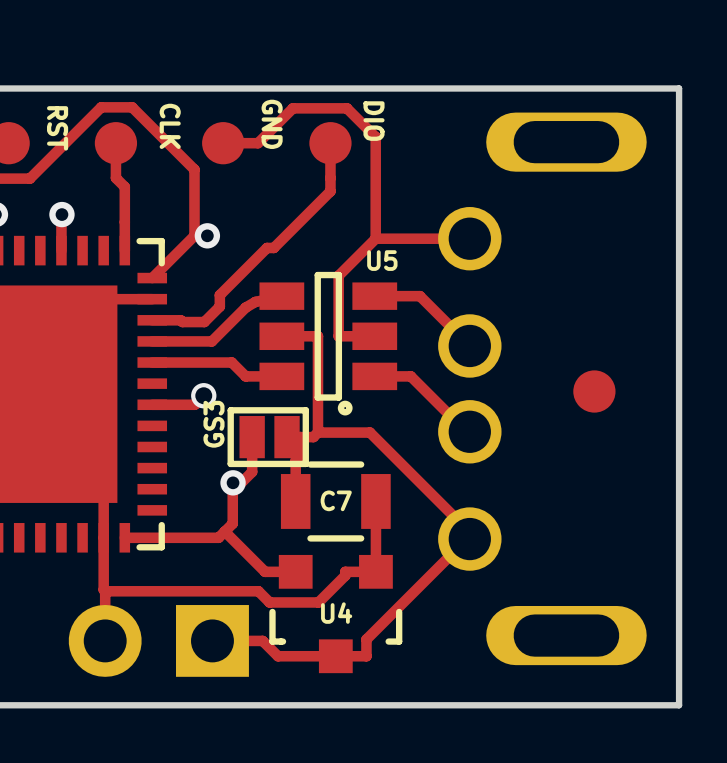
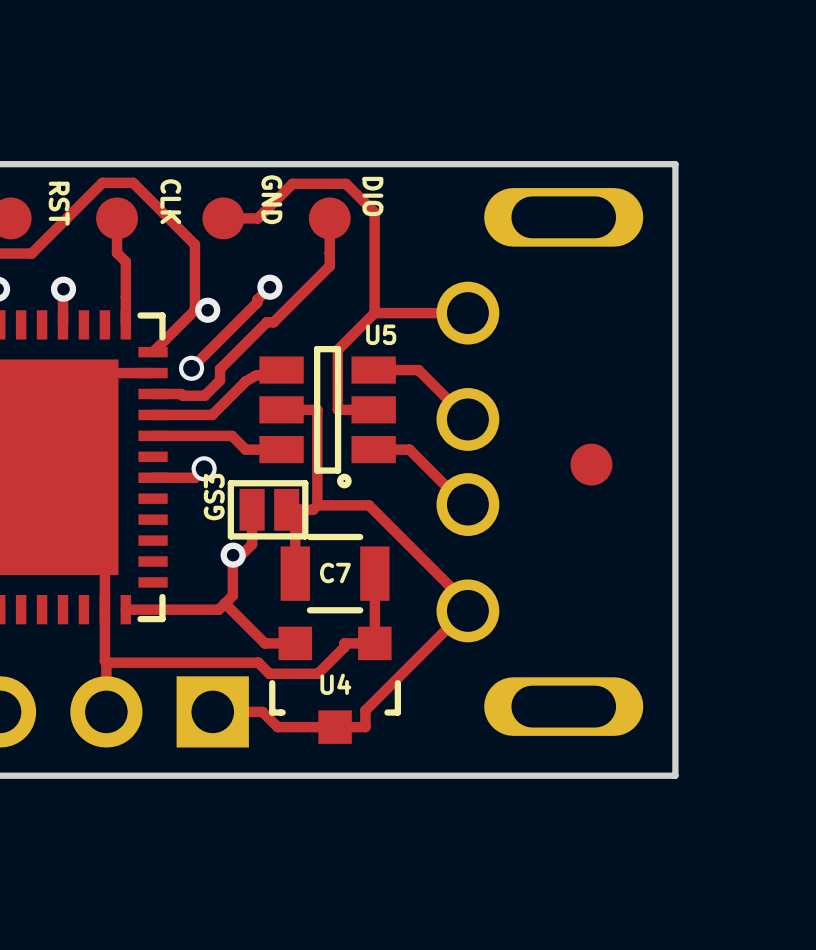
track: none -> (269, 287) (257, 299) (257, 302) (191, 368)
via: none -> (269, 287)
via: none -> (191, 368)

